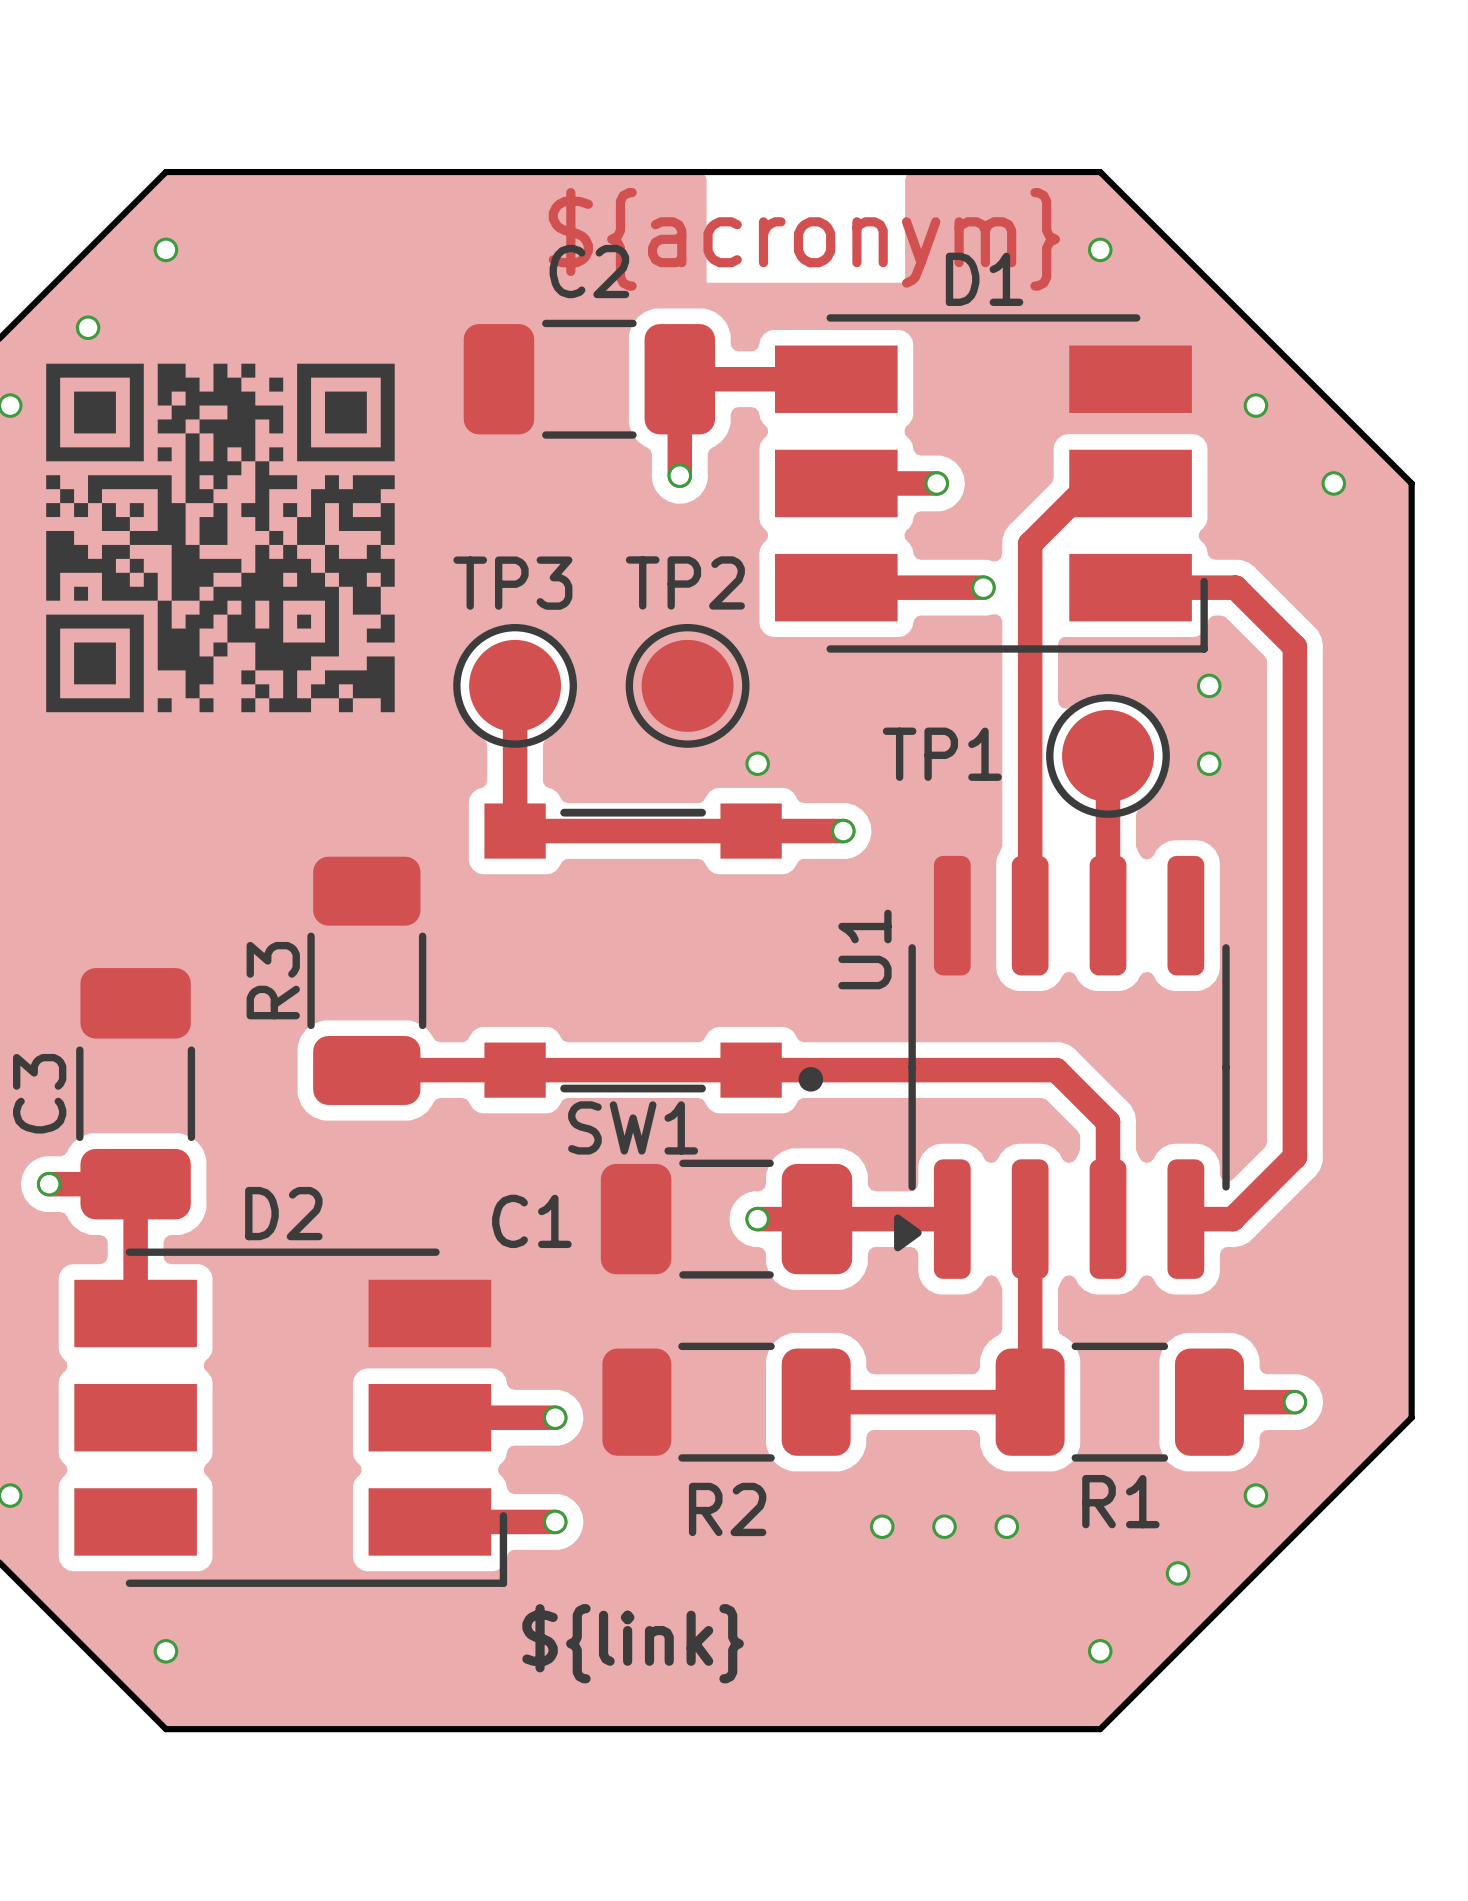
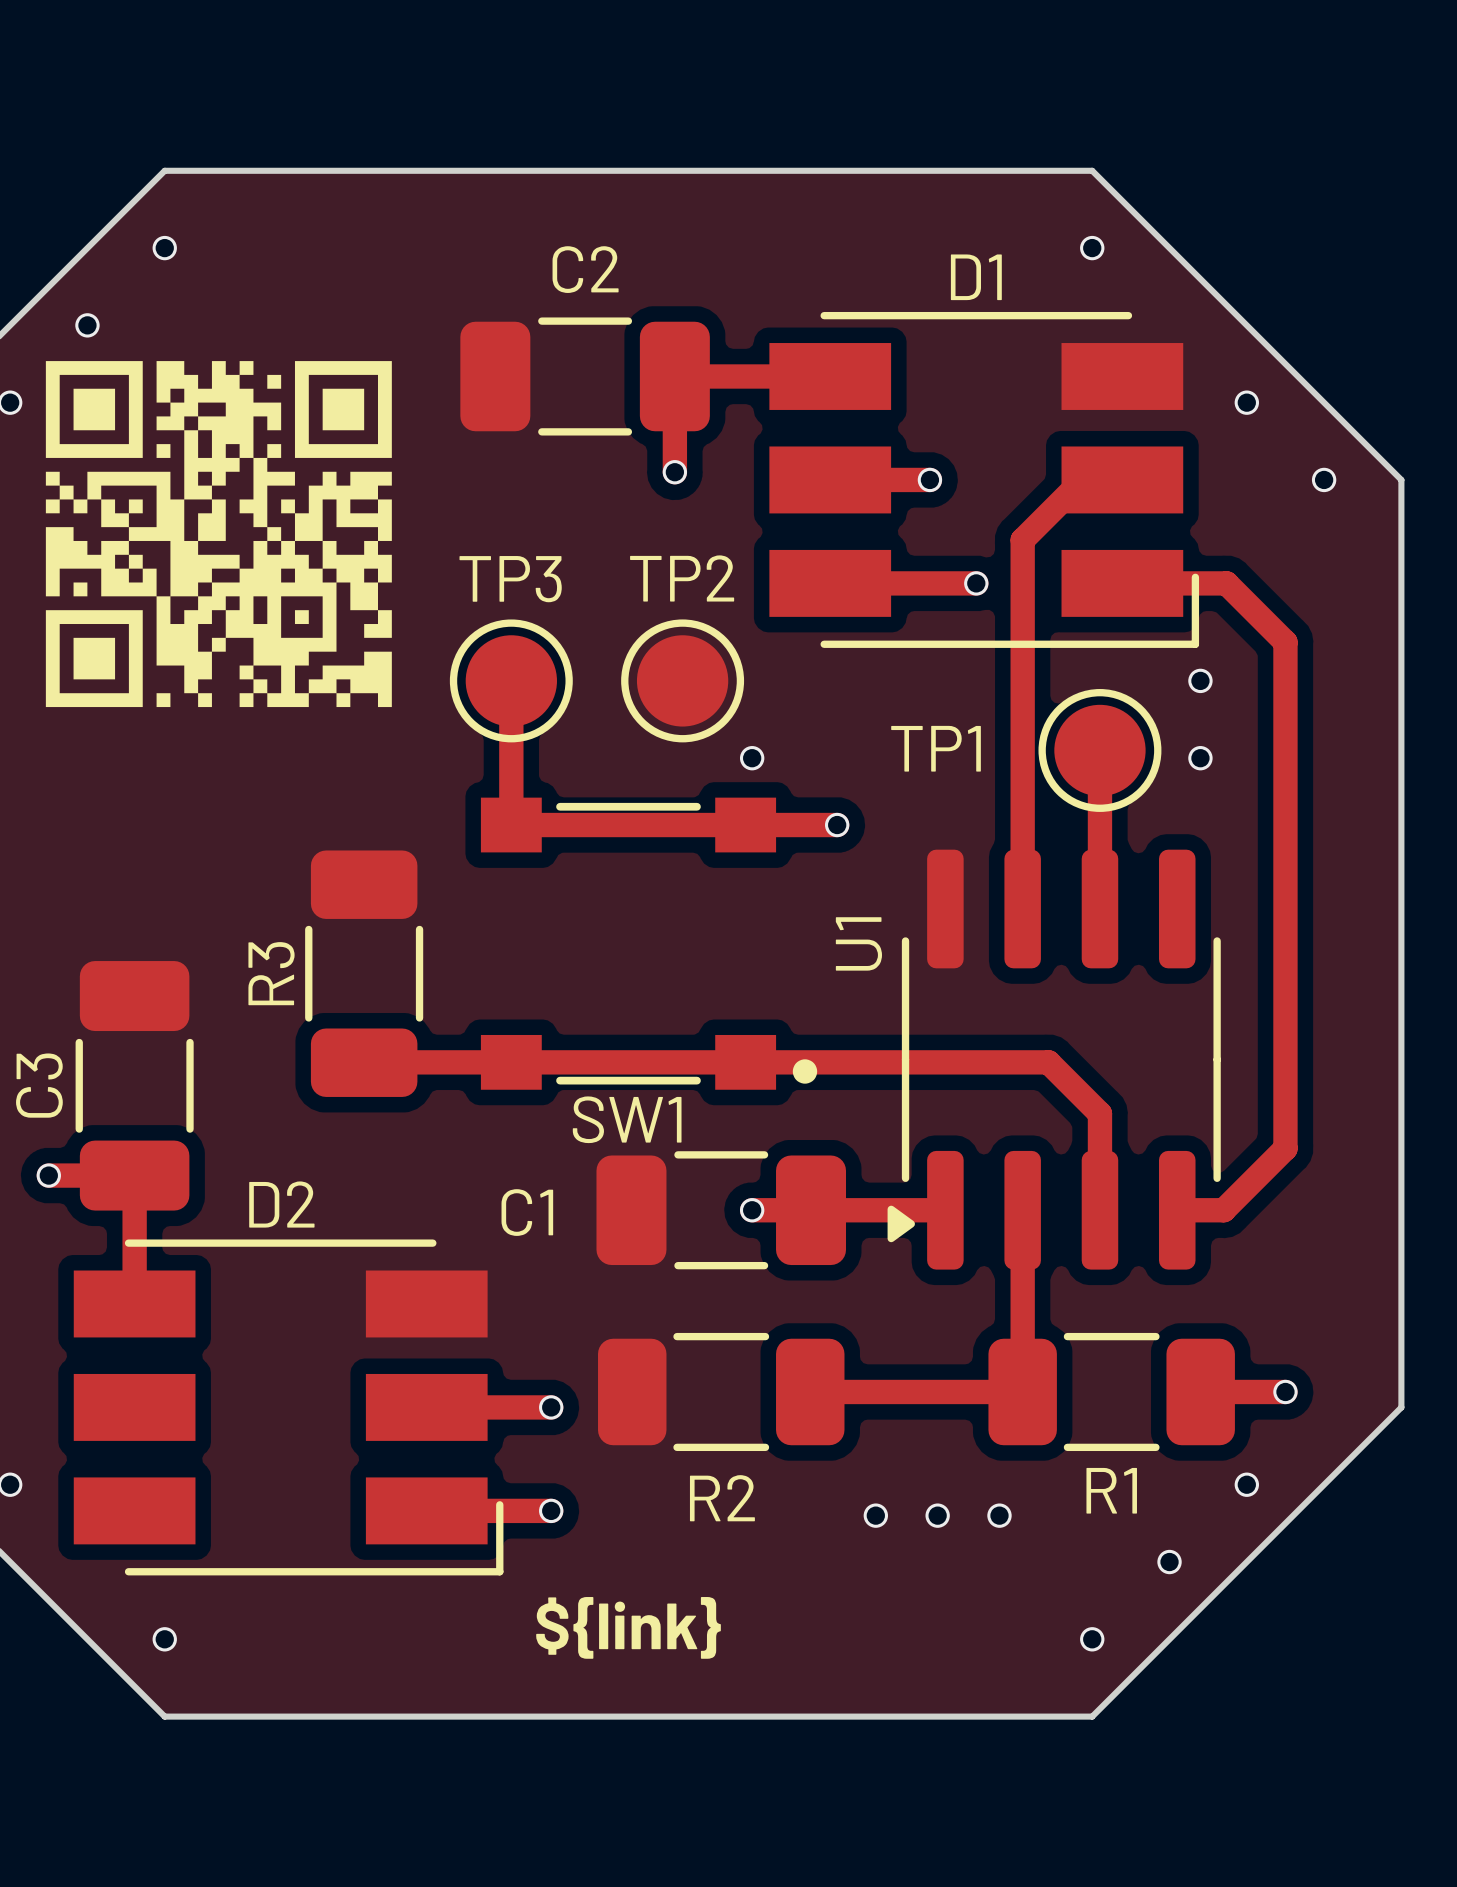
text: ${acronym} (804, 239) -> none

